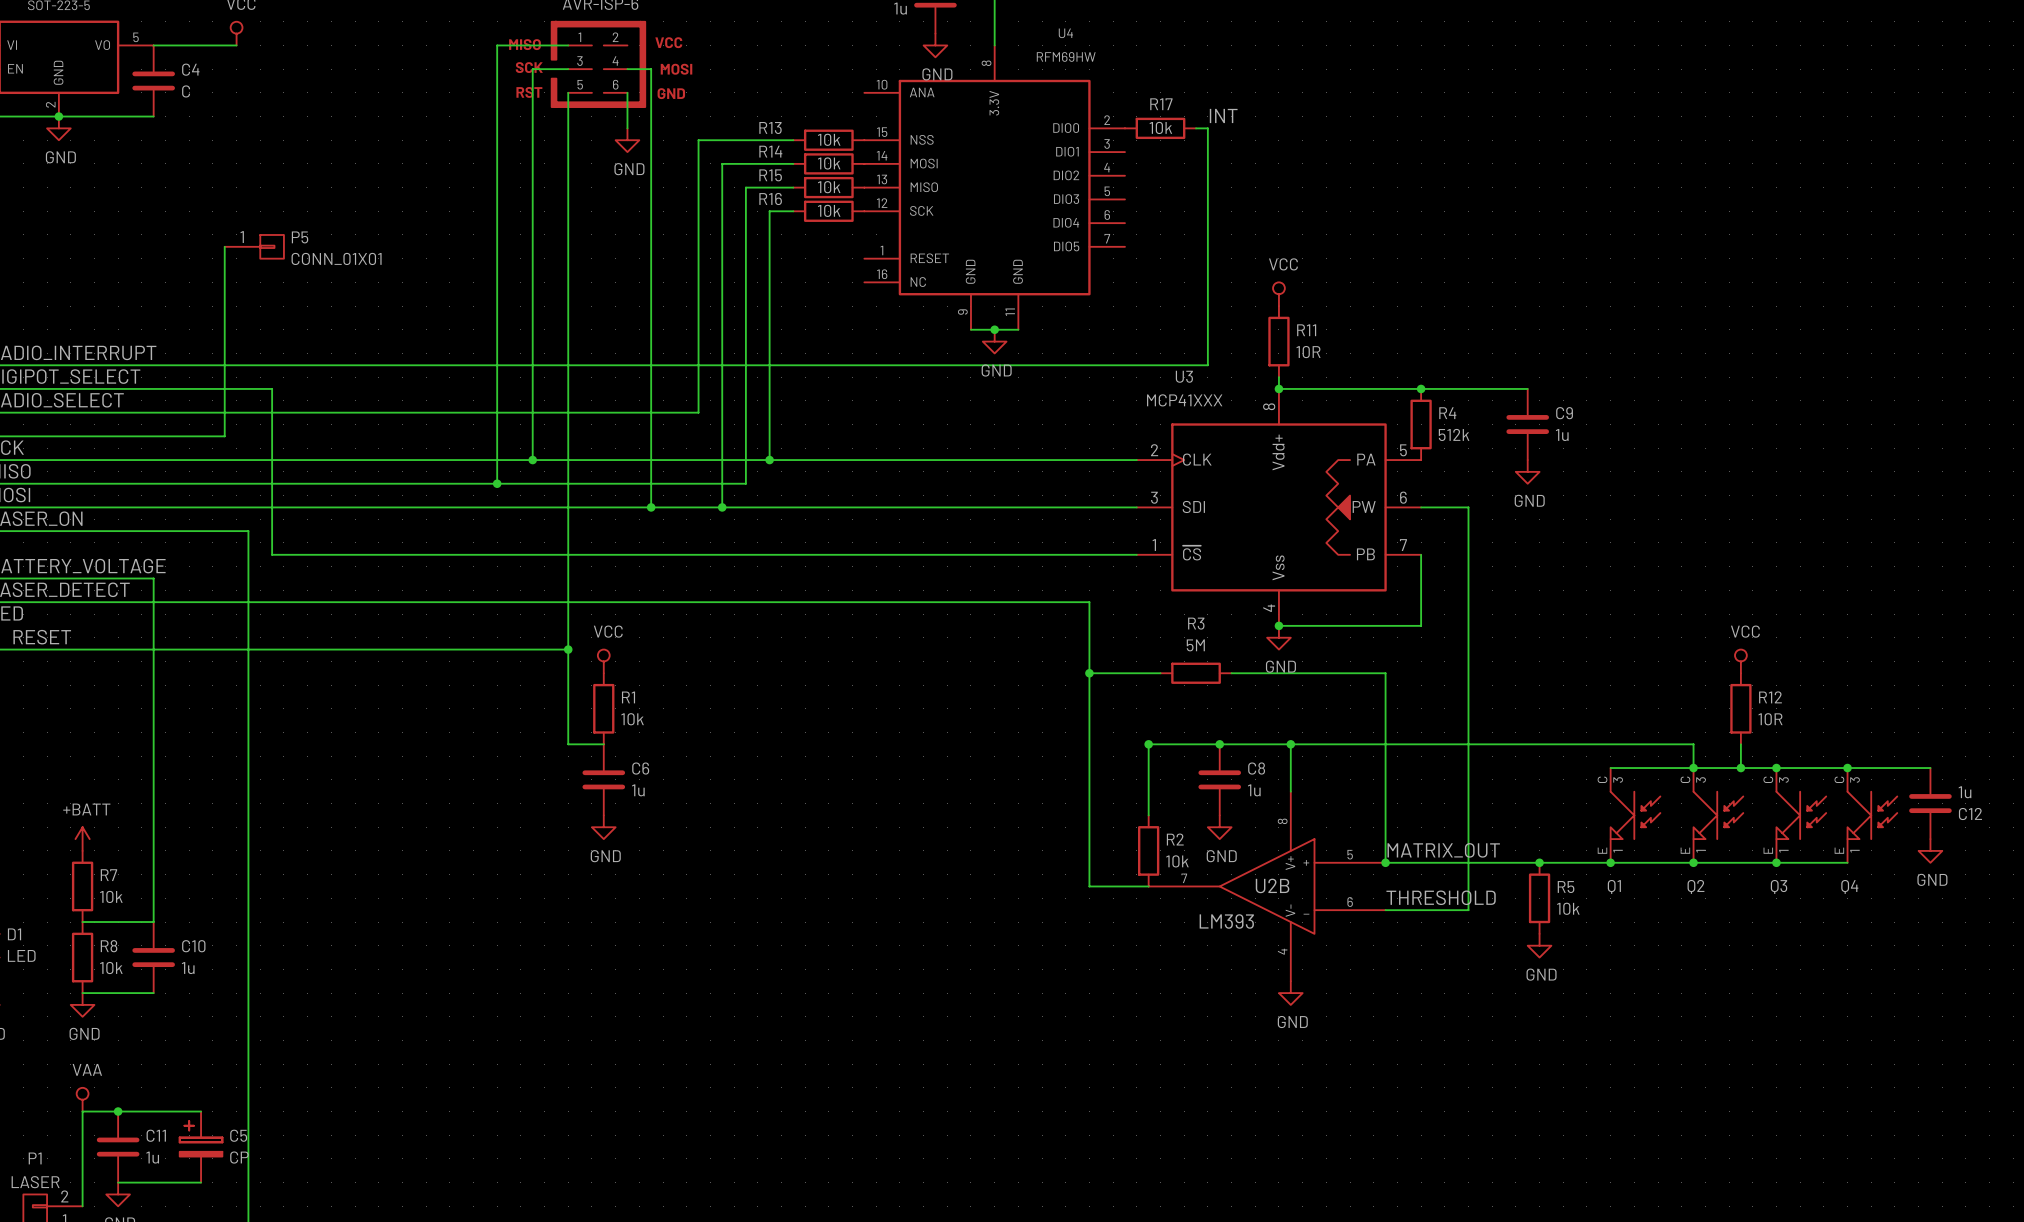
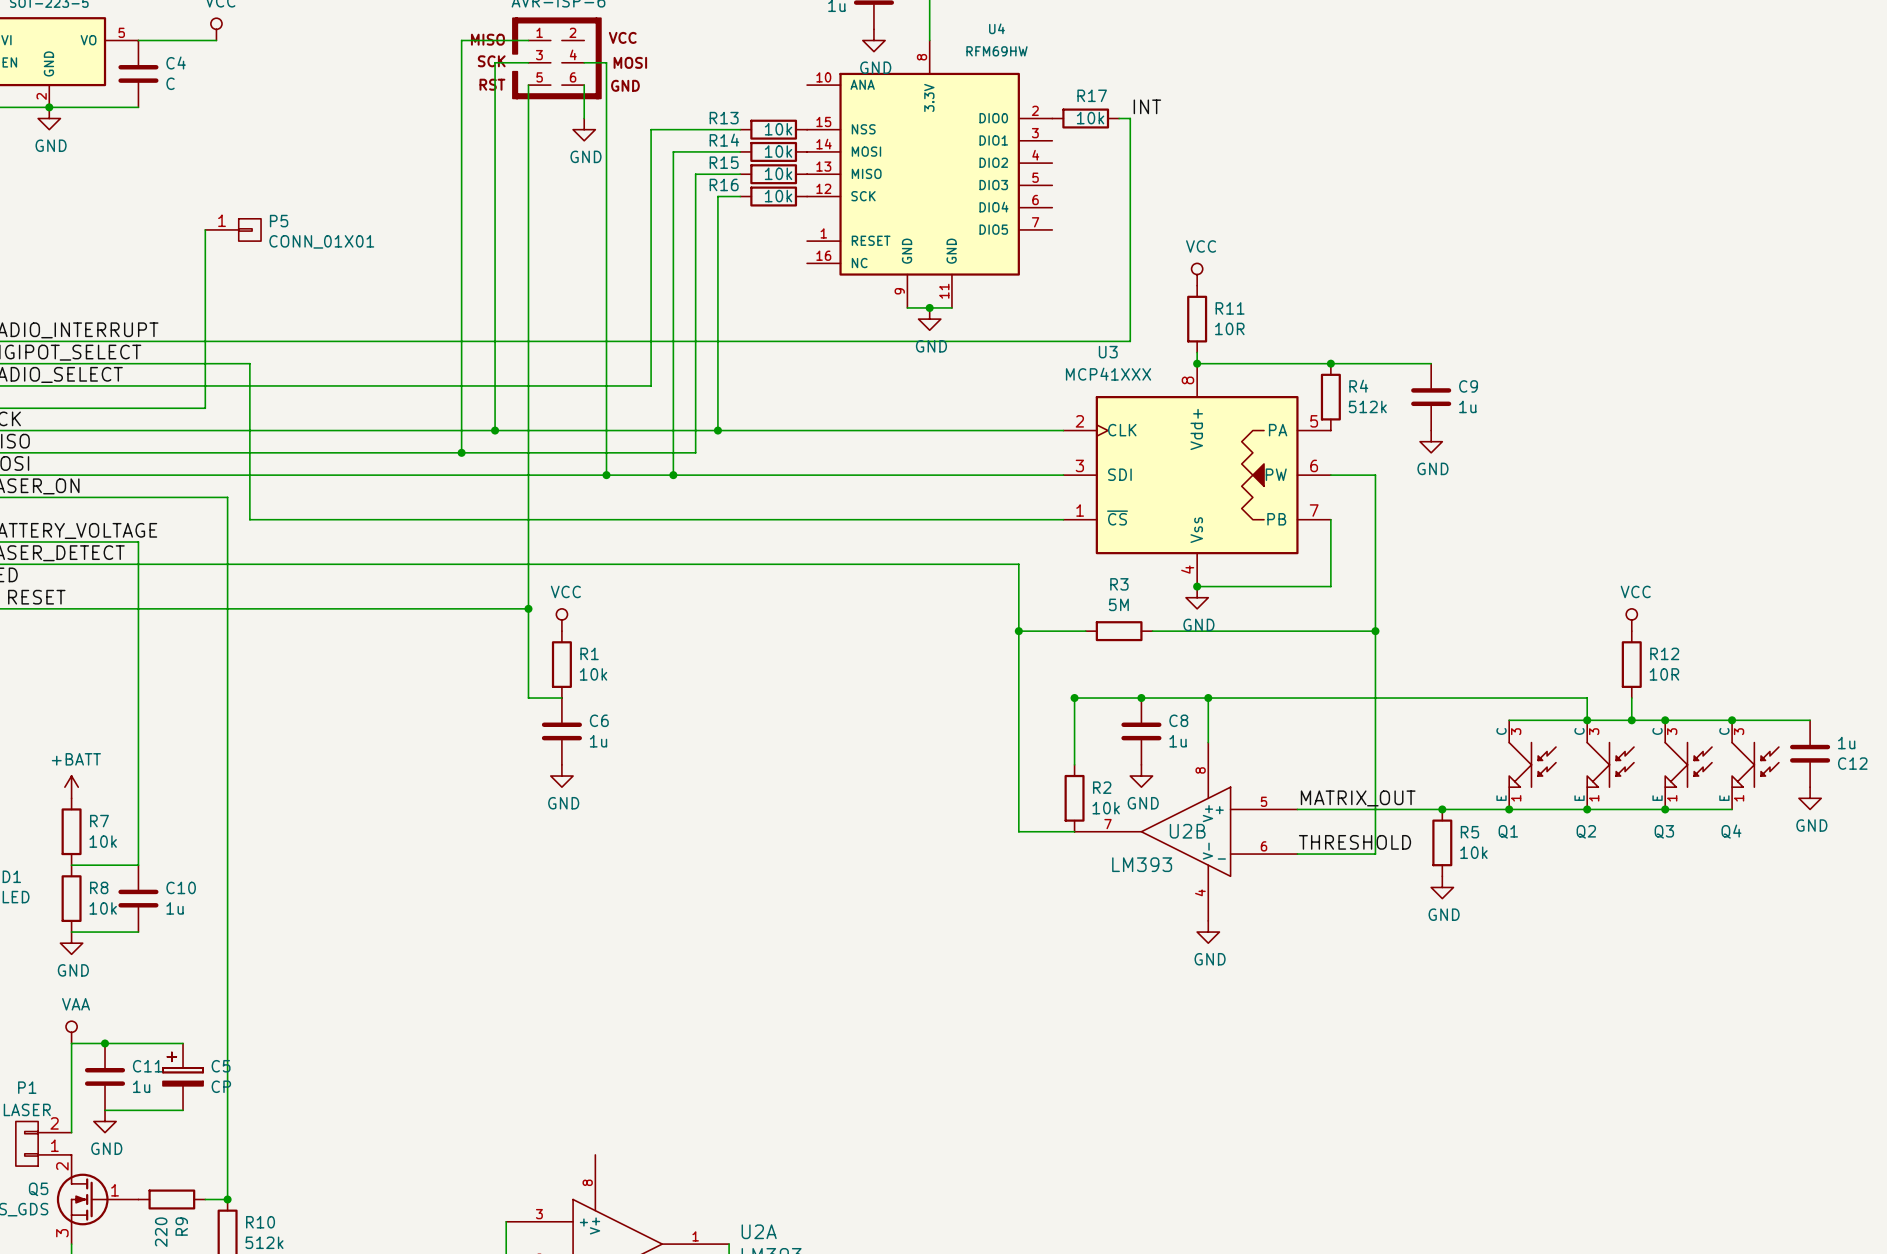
wire: (1385, 673) (1385, 862) -> (1297, 631) (1375, 631)
junction: none -> (1375, 631)
junction: (1385, 862) -> none

